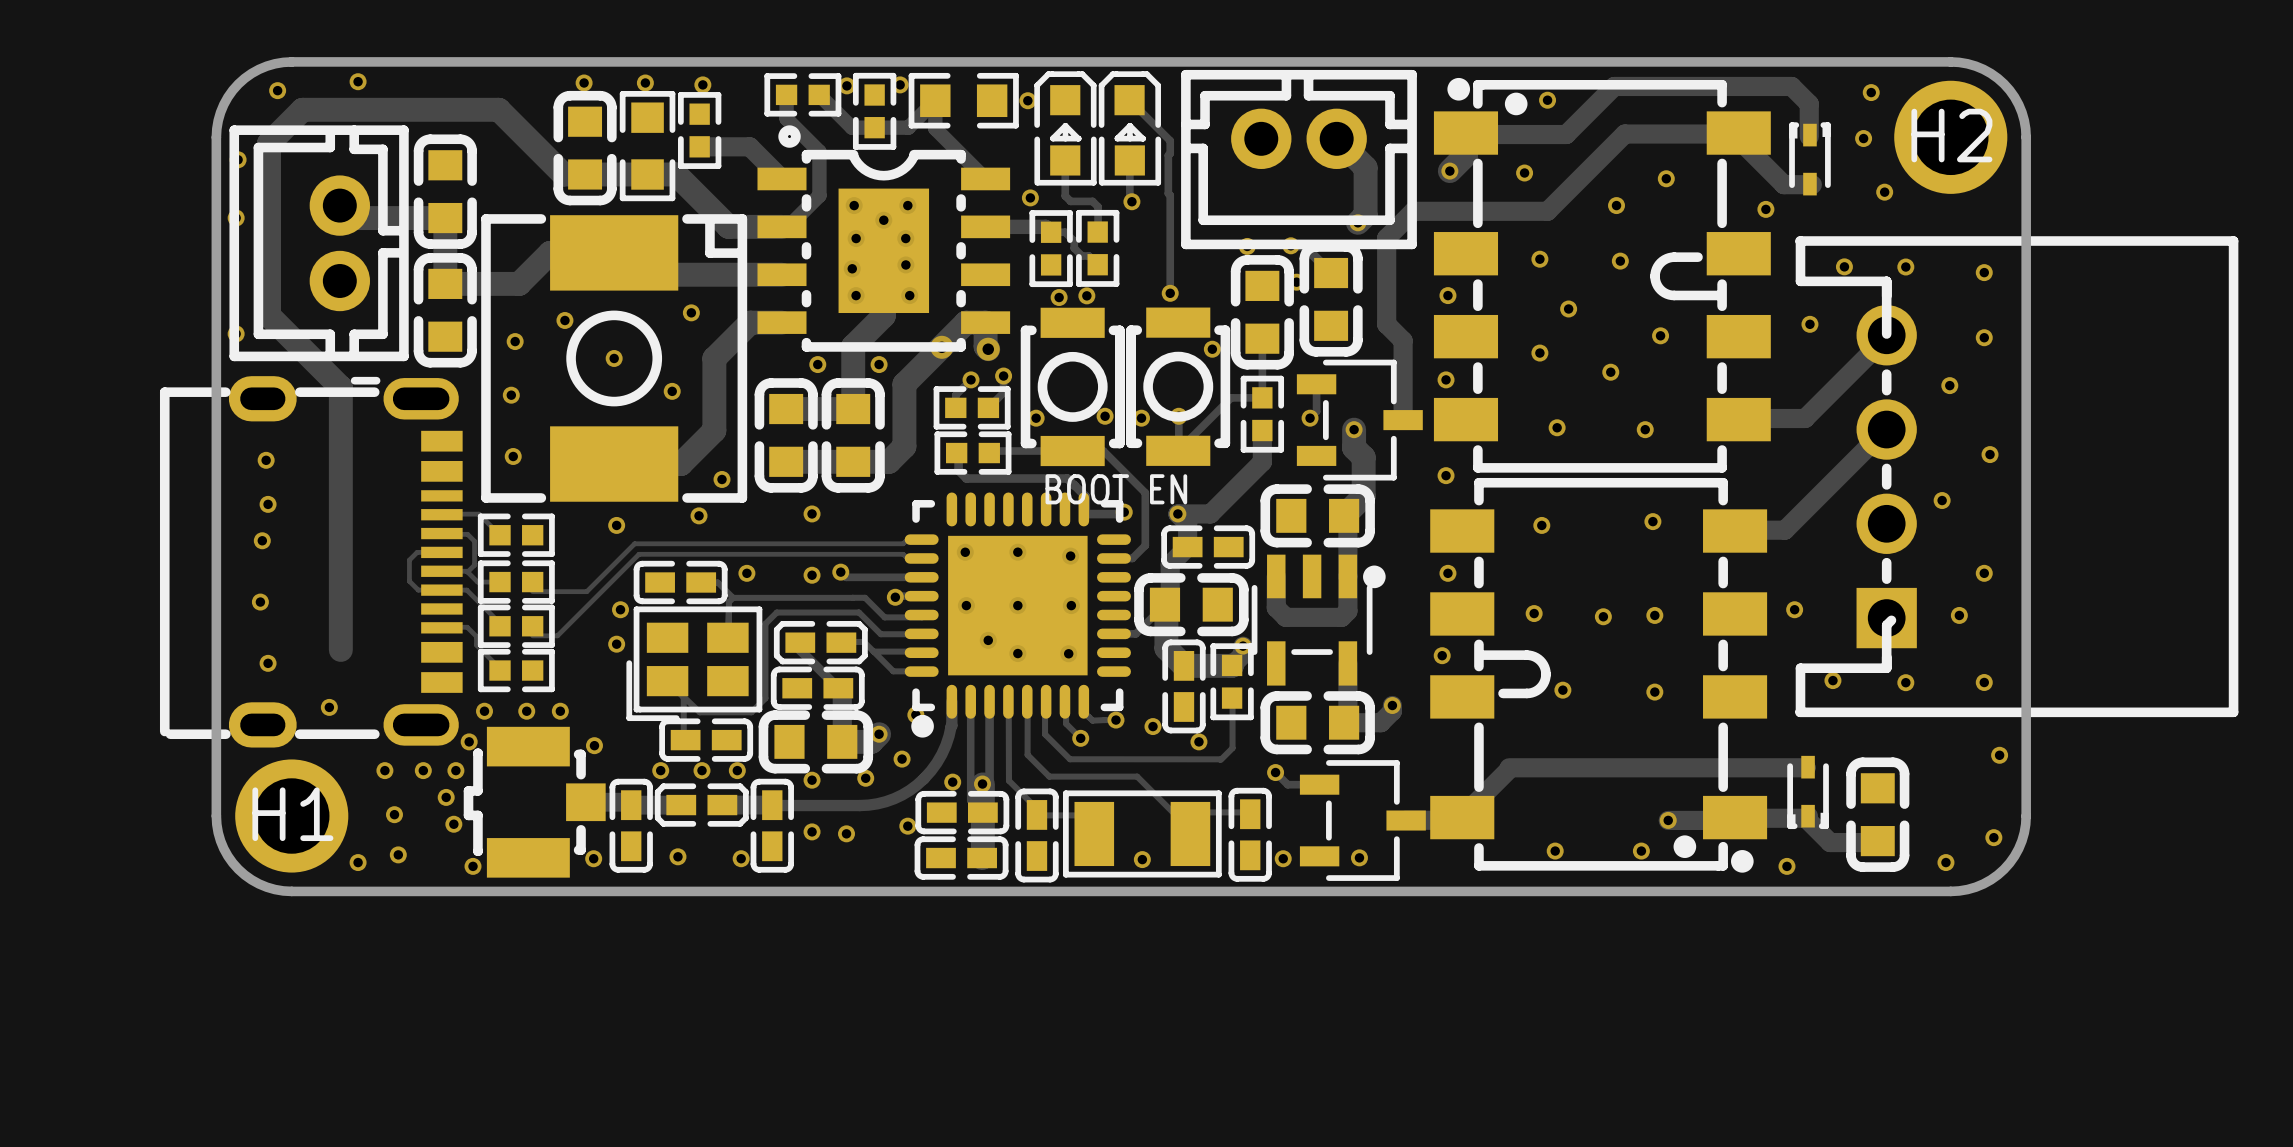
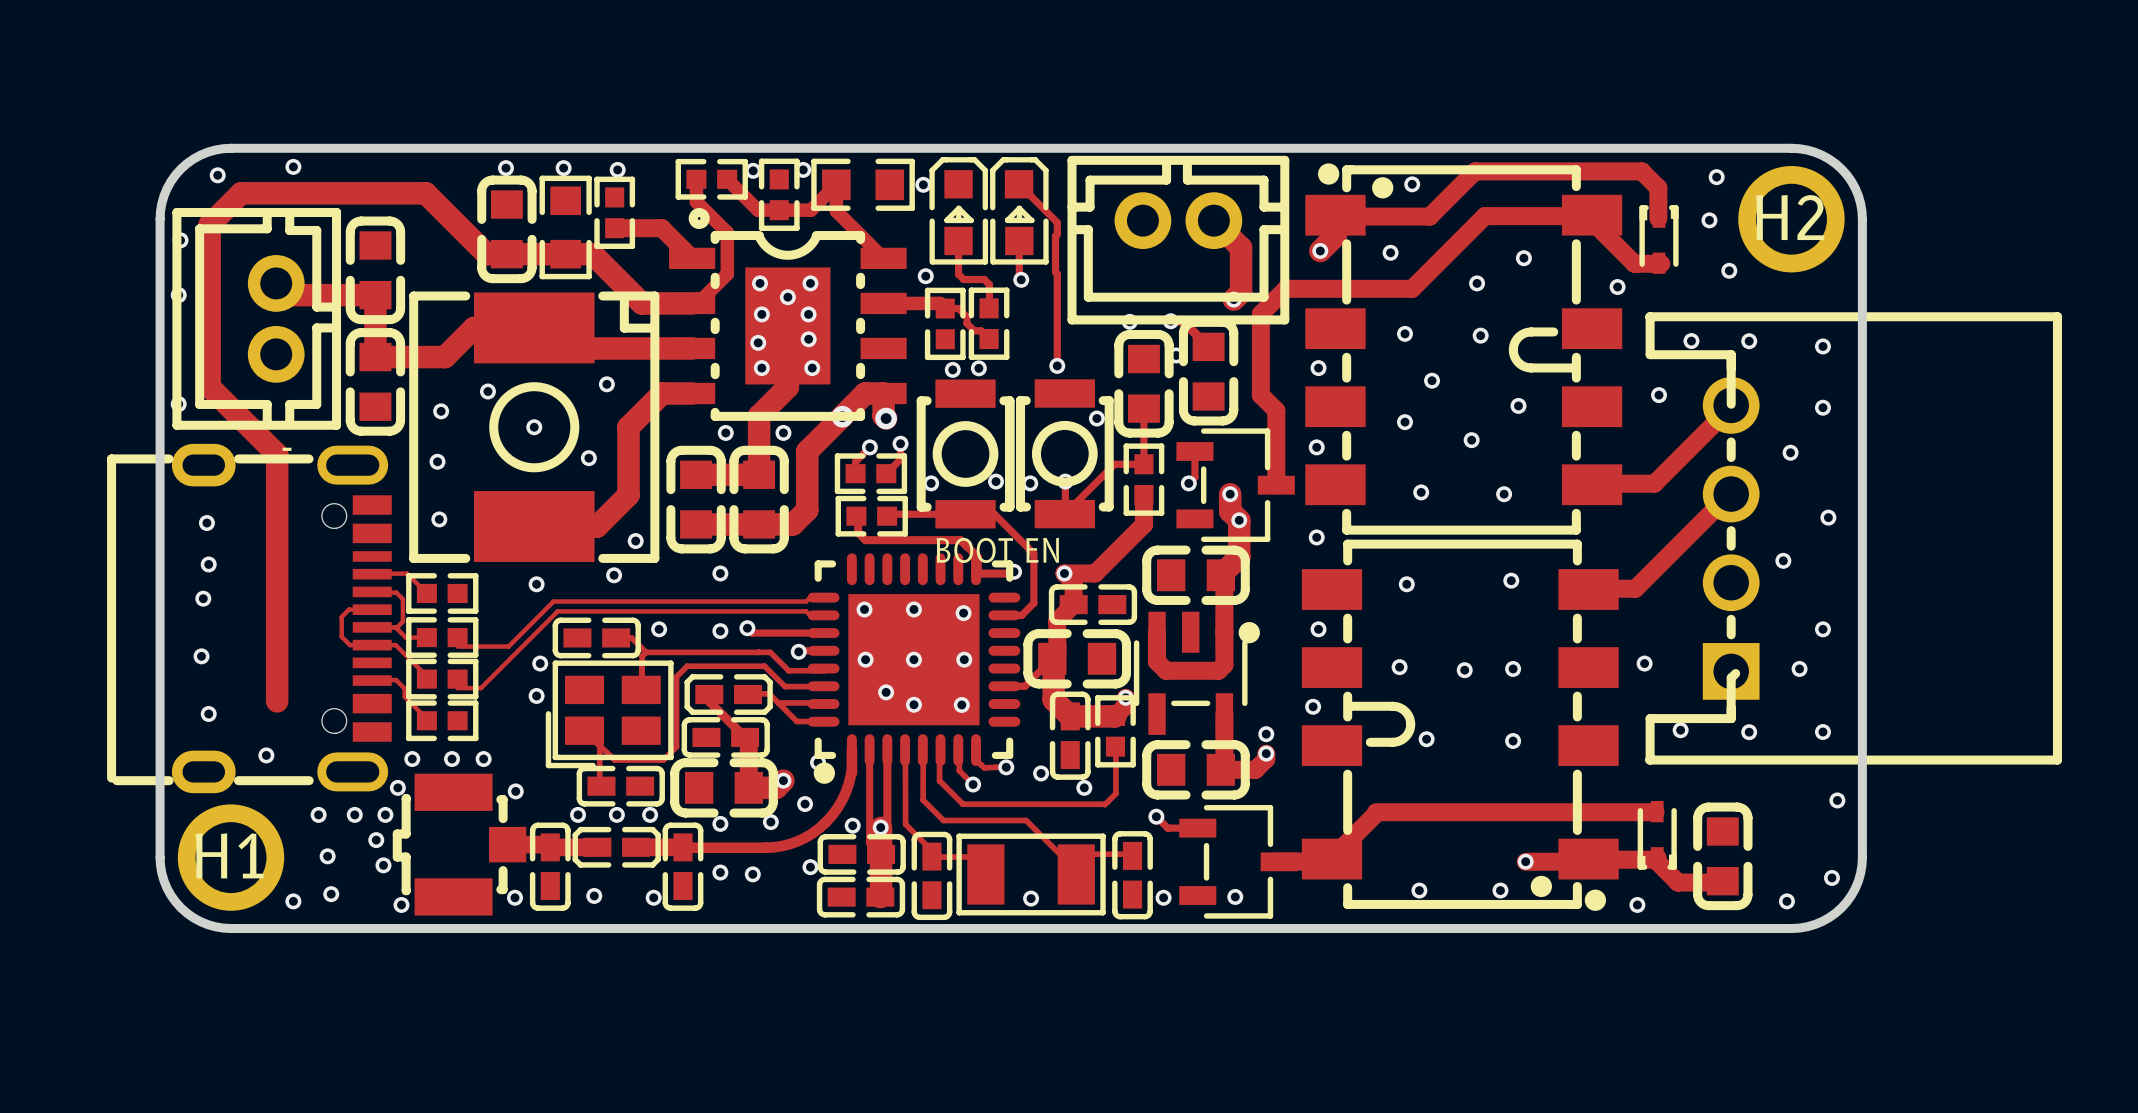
part footprint: [159, 376, 463, 748] -> [107, 443, 392, 794]
via: none -> (1239, 520)
via: none -> (1266, 734)

